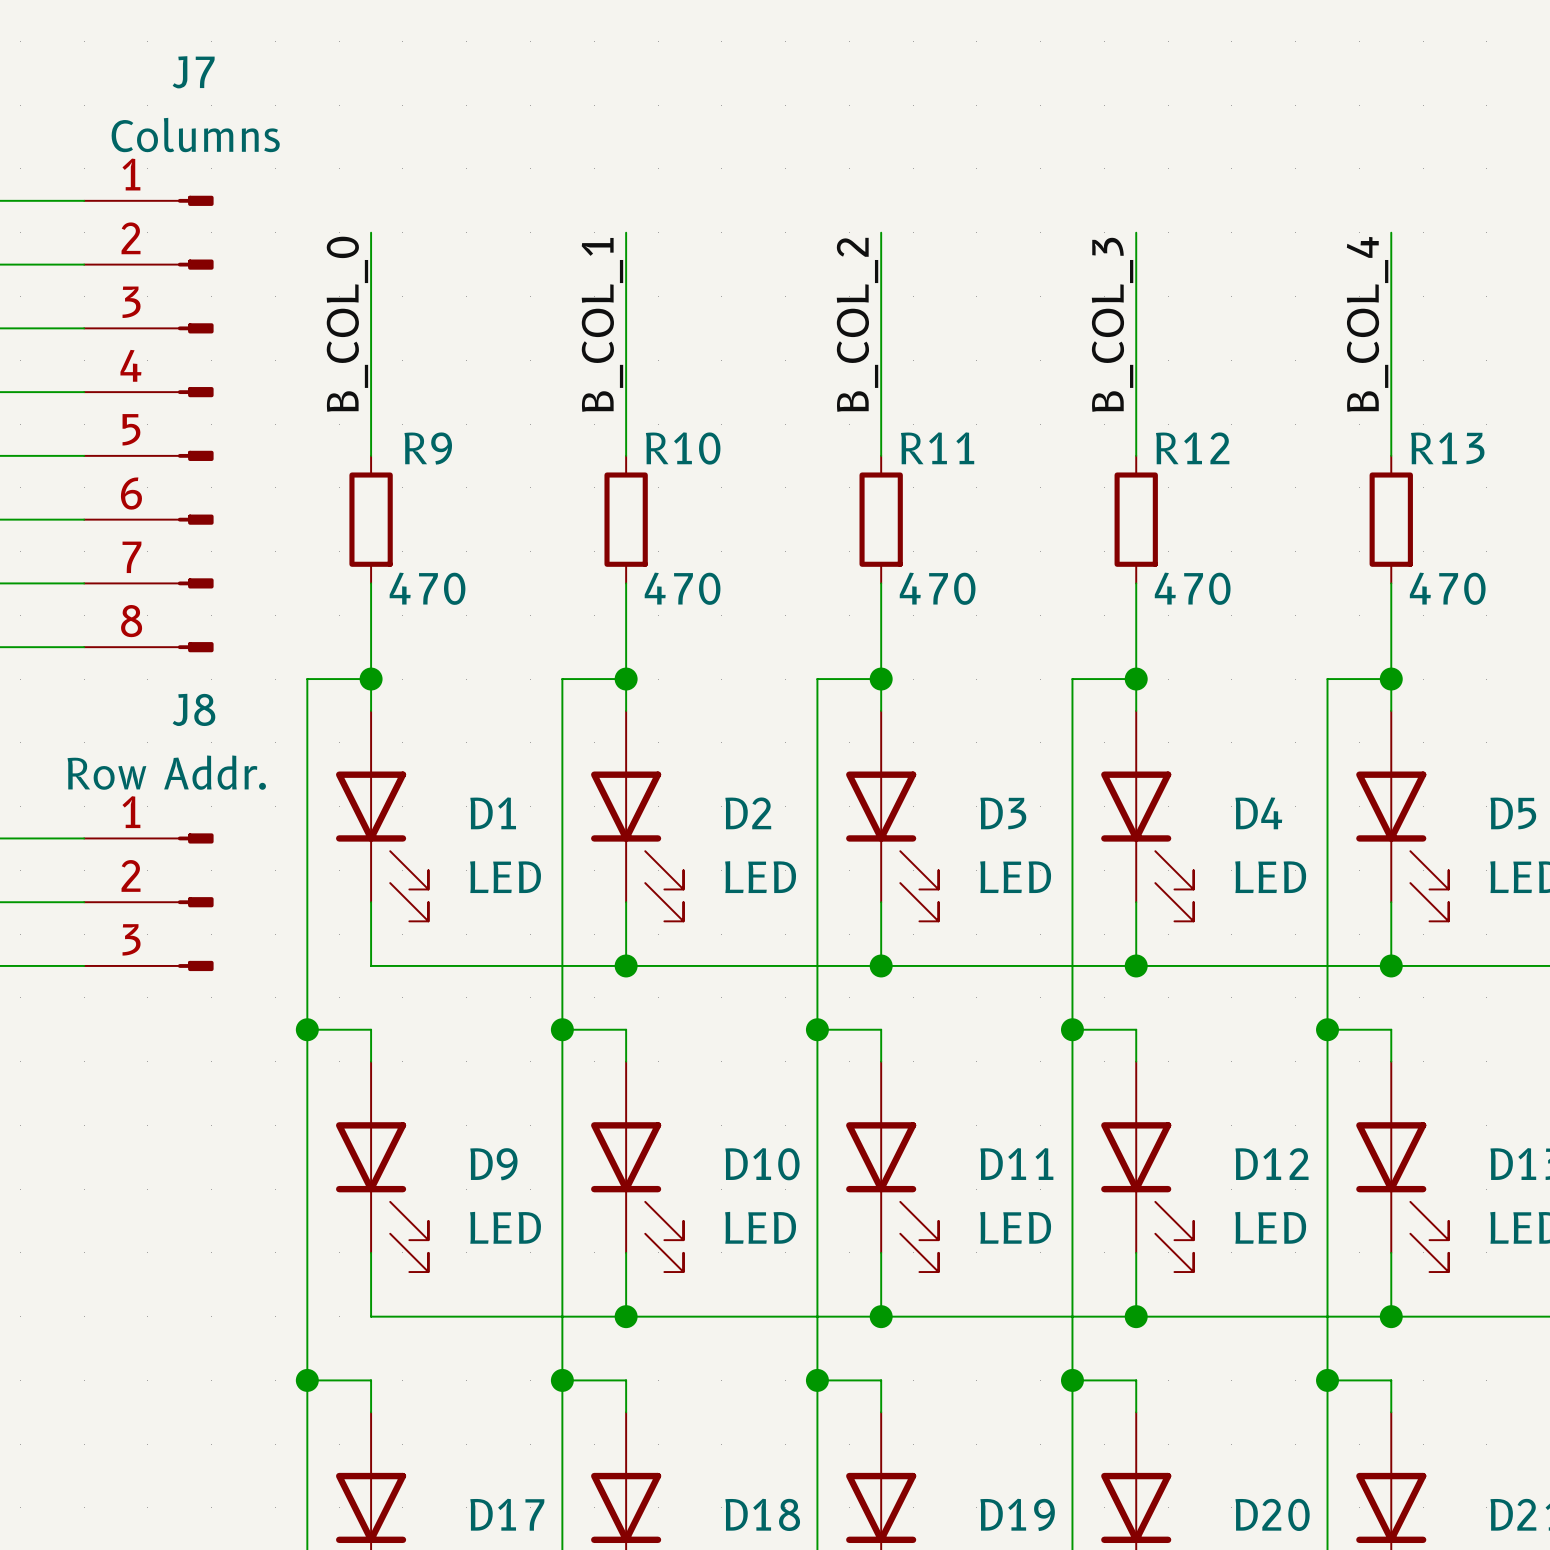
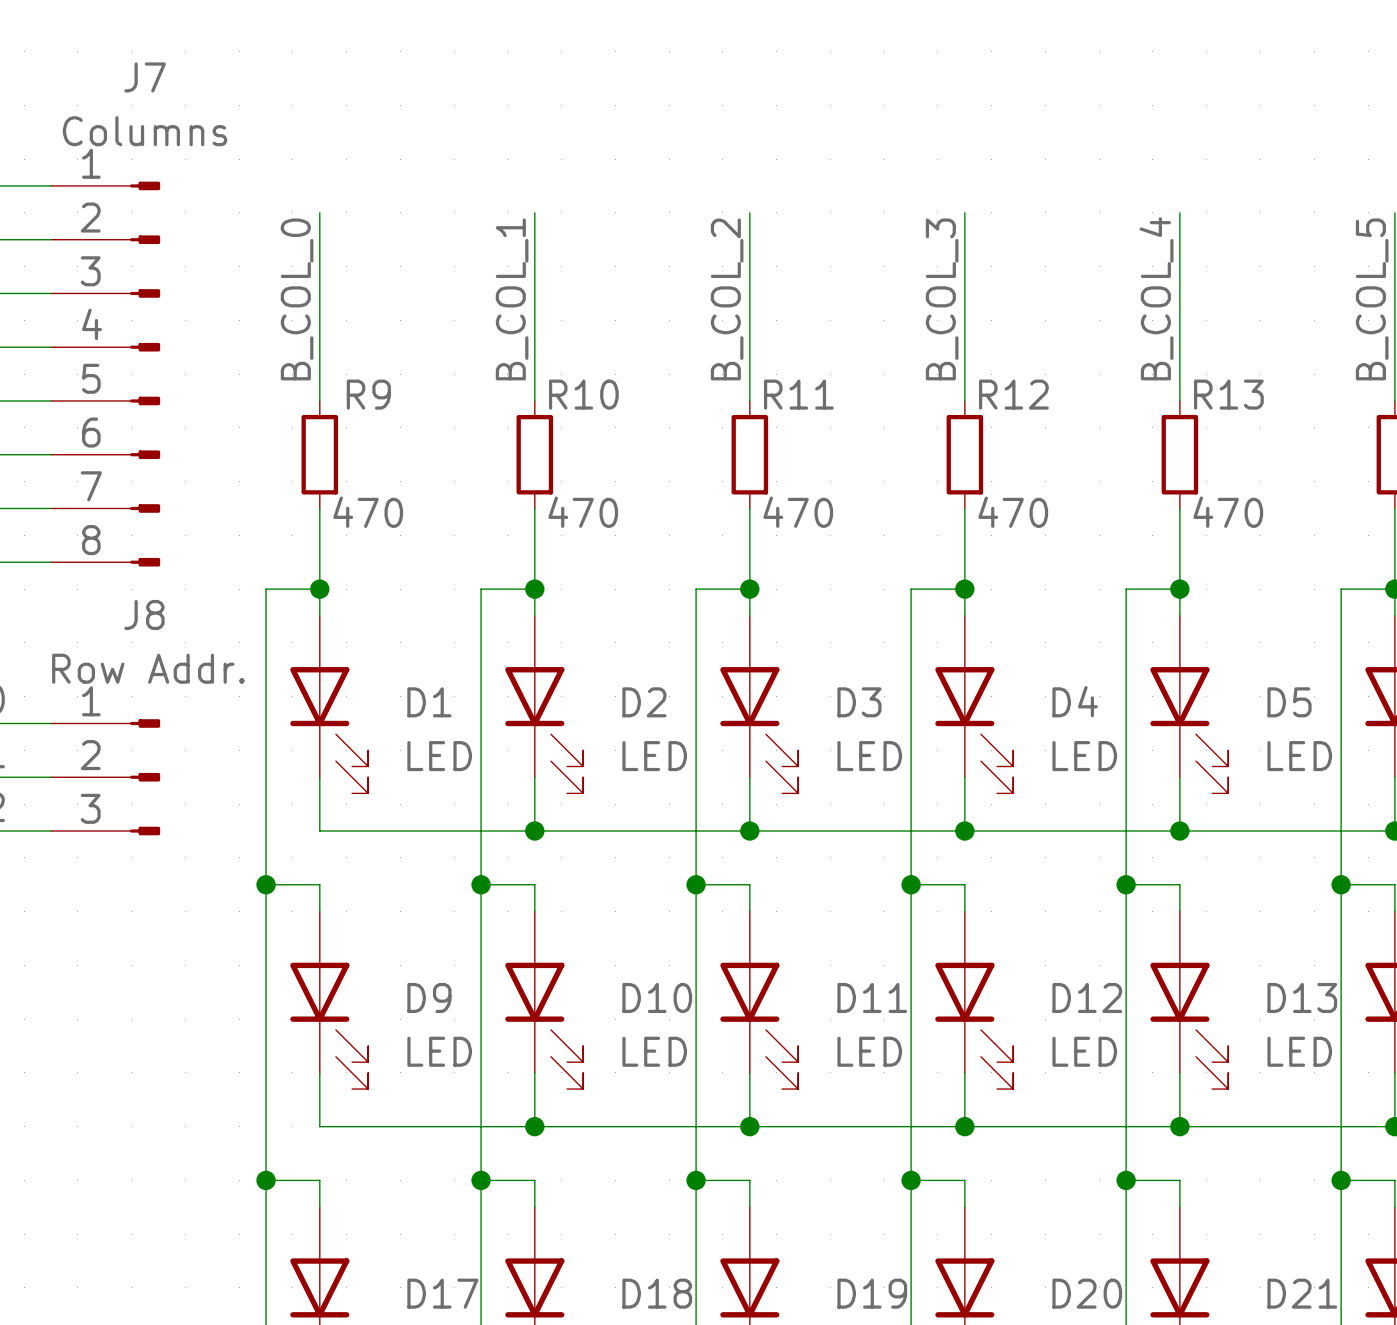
J7 position: (148, 424) -> (105, 374)
J8 position: (148, 902) -> (105, 777)

